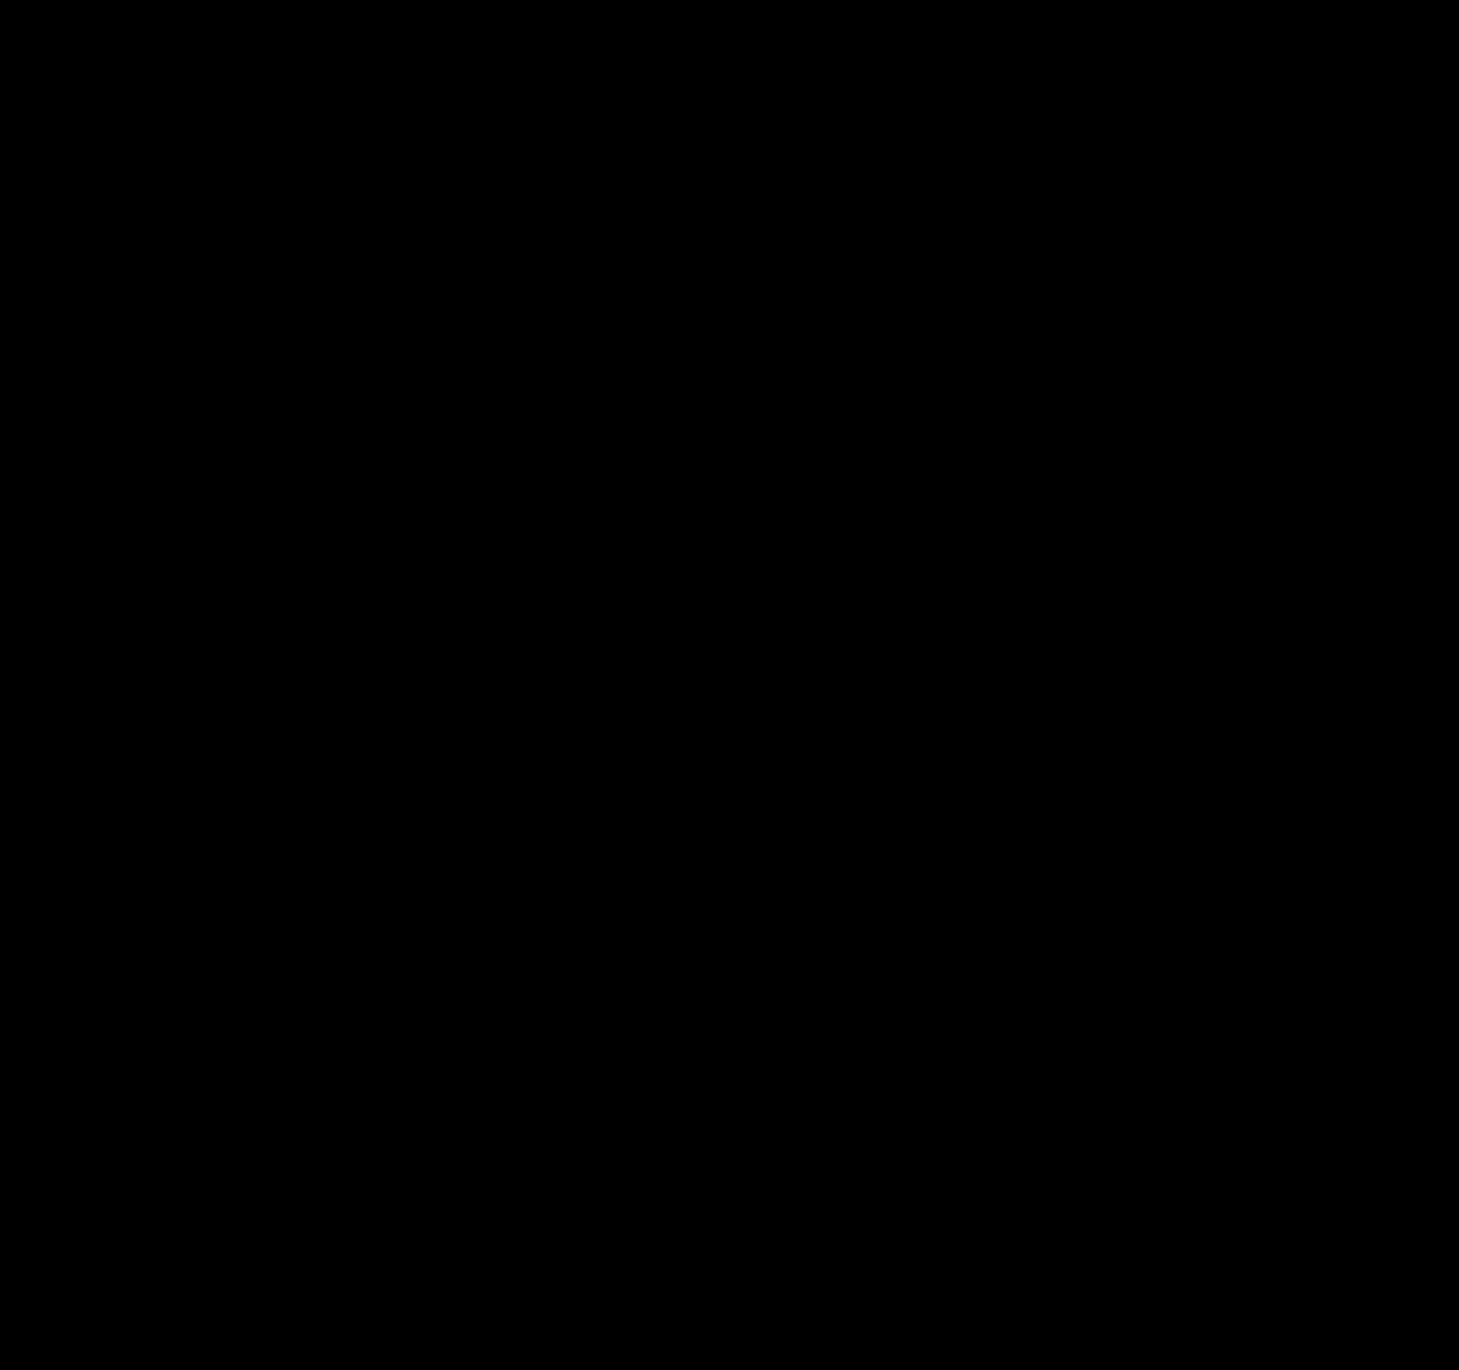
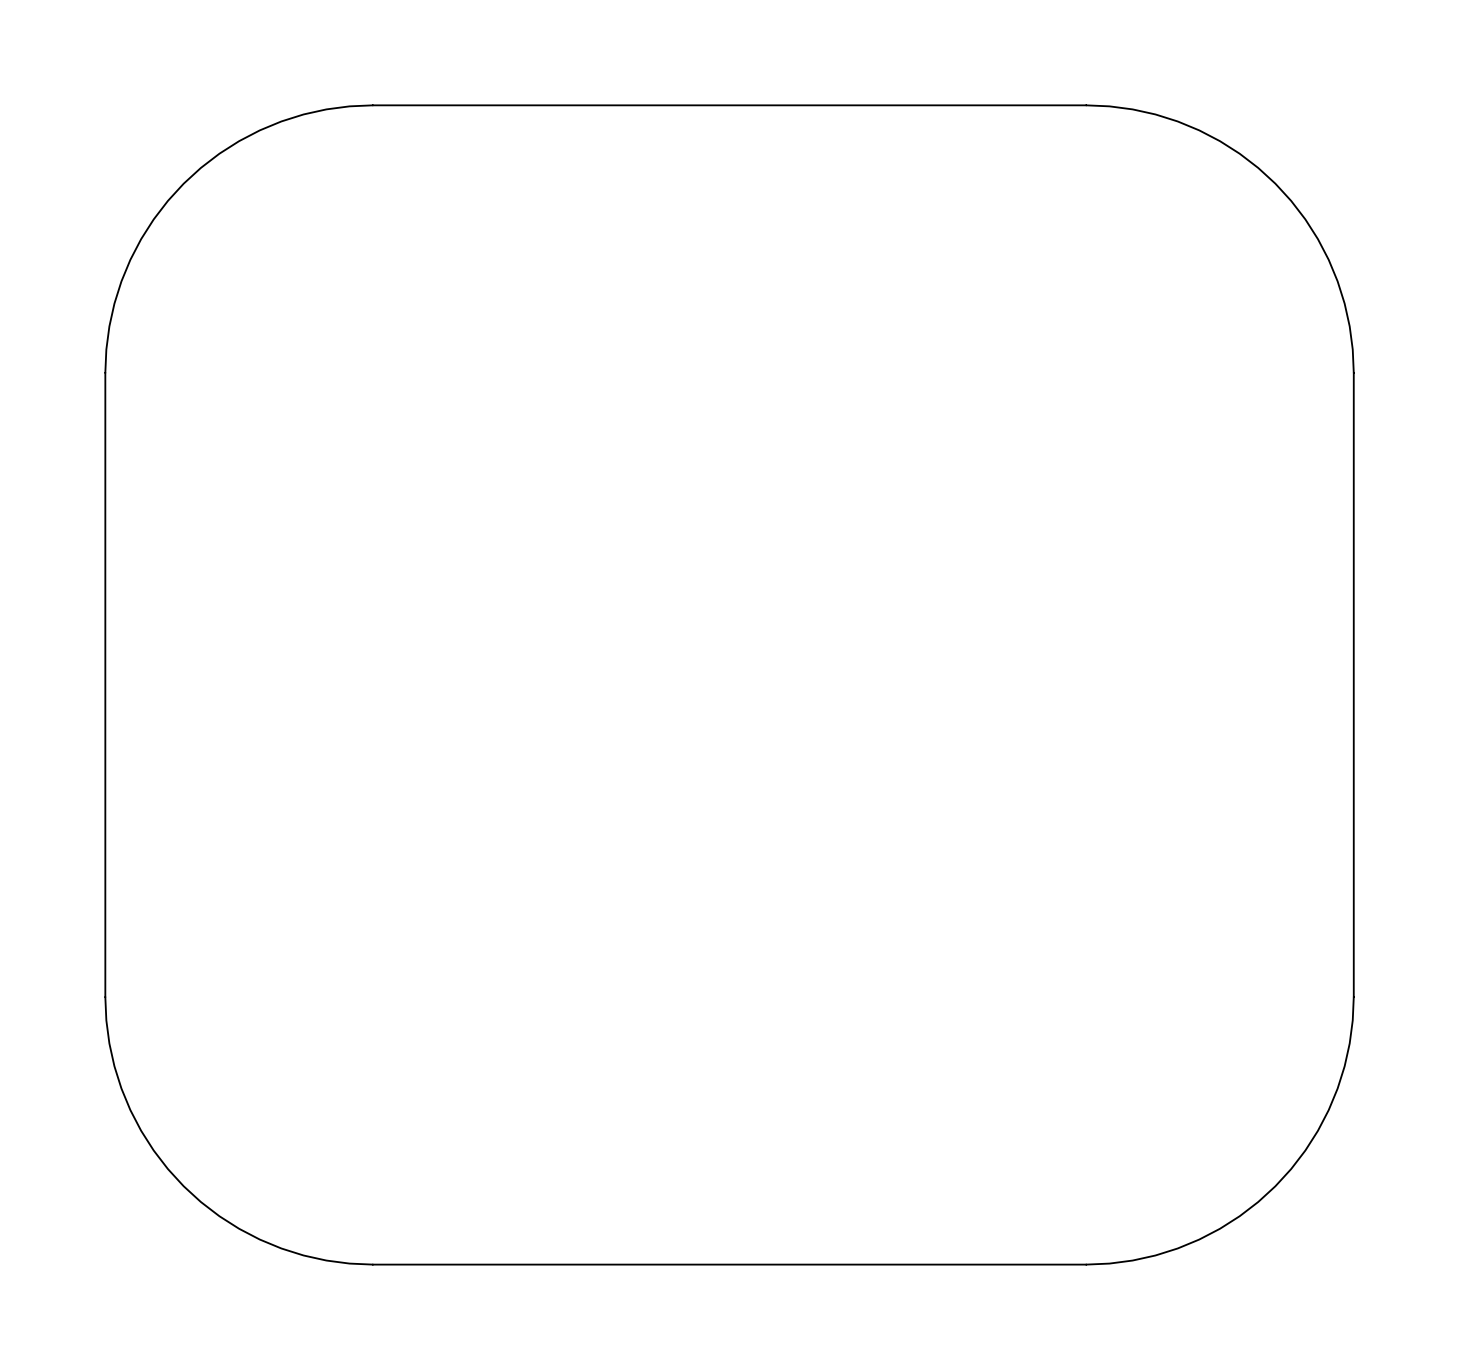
board edge: none -> (1086, 105) (349, 106) (303, 114) (259, 130) (219, 153) (200, 167) (167, 200) (153, 219) (130, 259) (114, 303) (106, 349) (105, 997) (106, 1020) (114, 1066) (130, 1110) (153, 1150) (167, 1169) (200, 1202) (219, 1216) (259, 1239) (303, 1255) (349, 1263) (1086, 1264) (1109, 1263) (1155, 1255) (1199, 1239) (1239, 1216) (1258, 1202) (1291, 1169) (1305, 1150) (1328, 1110) (1344, 1066) (1352, 1020) (1353, 372) (1349, 326) (1337, 281) (1317, 239) (1291, 200) (1258, 167) (1220, 141) (1177, 121) (1132, 109) (1086, 105)

